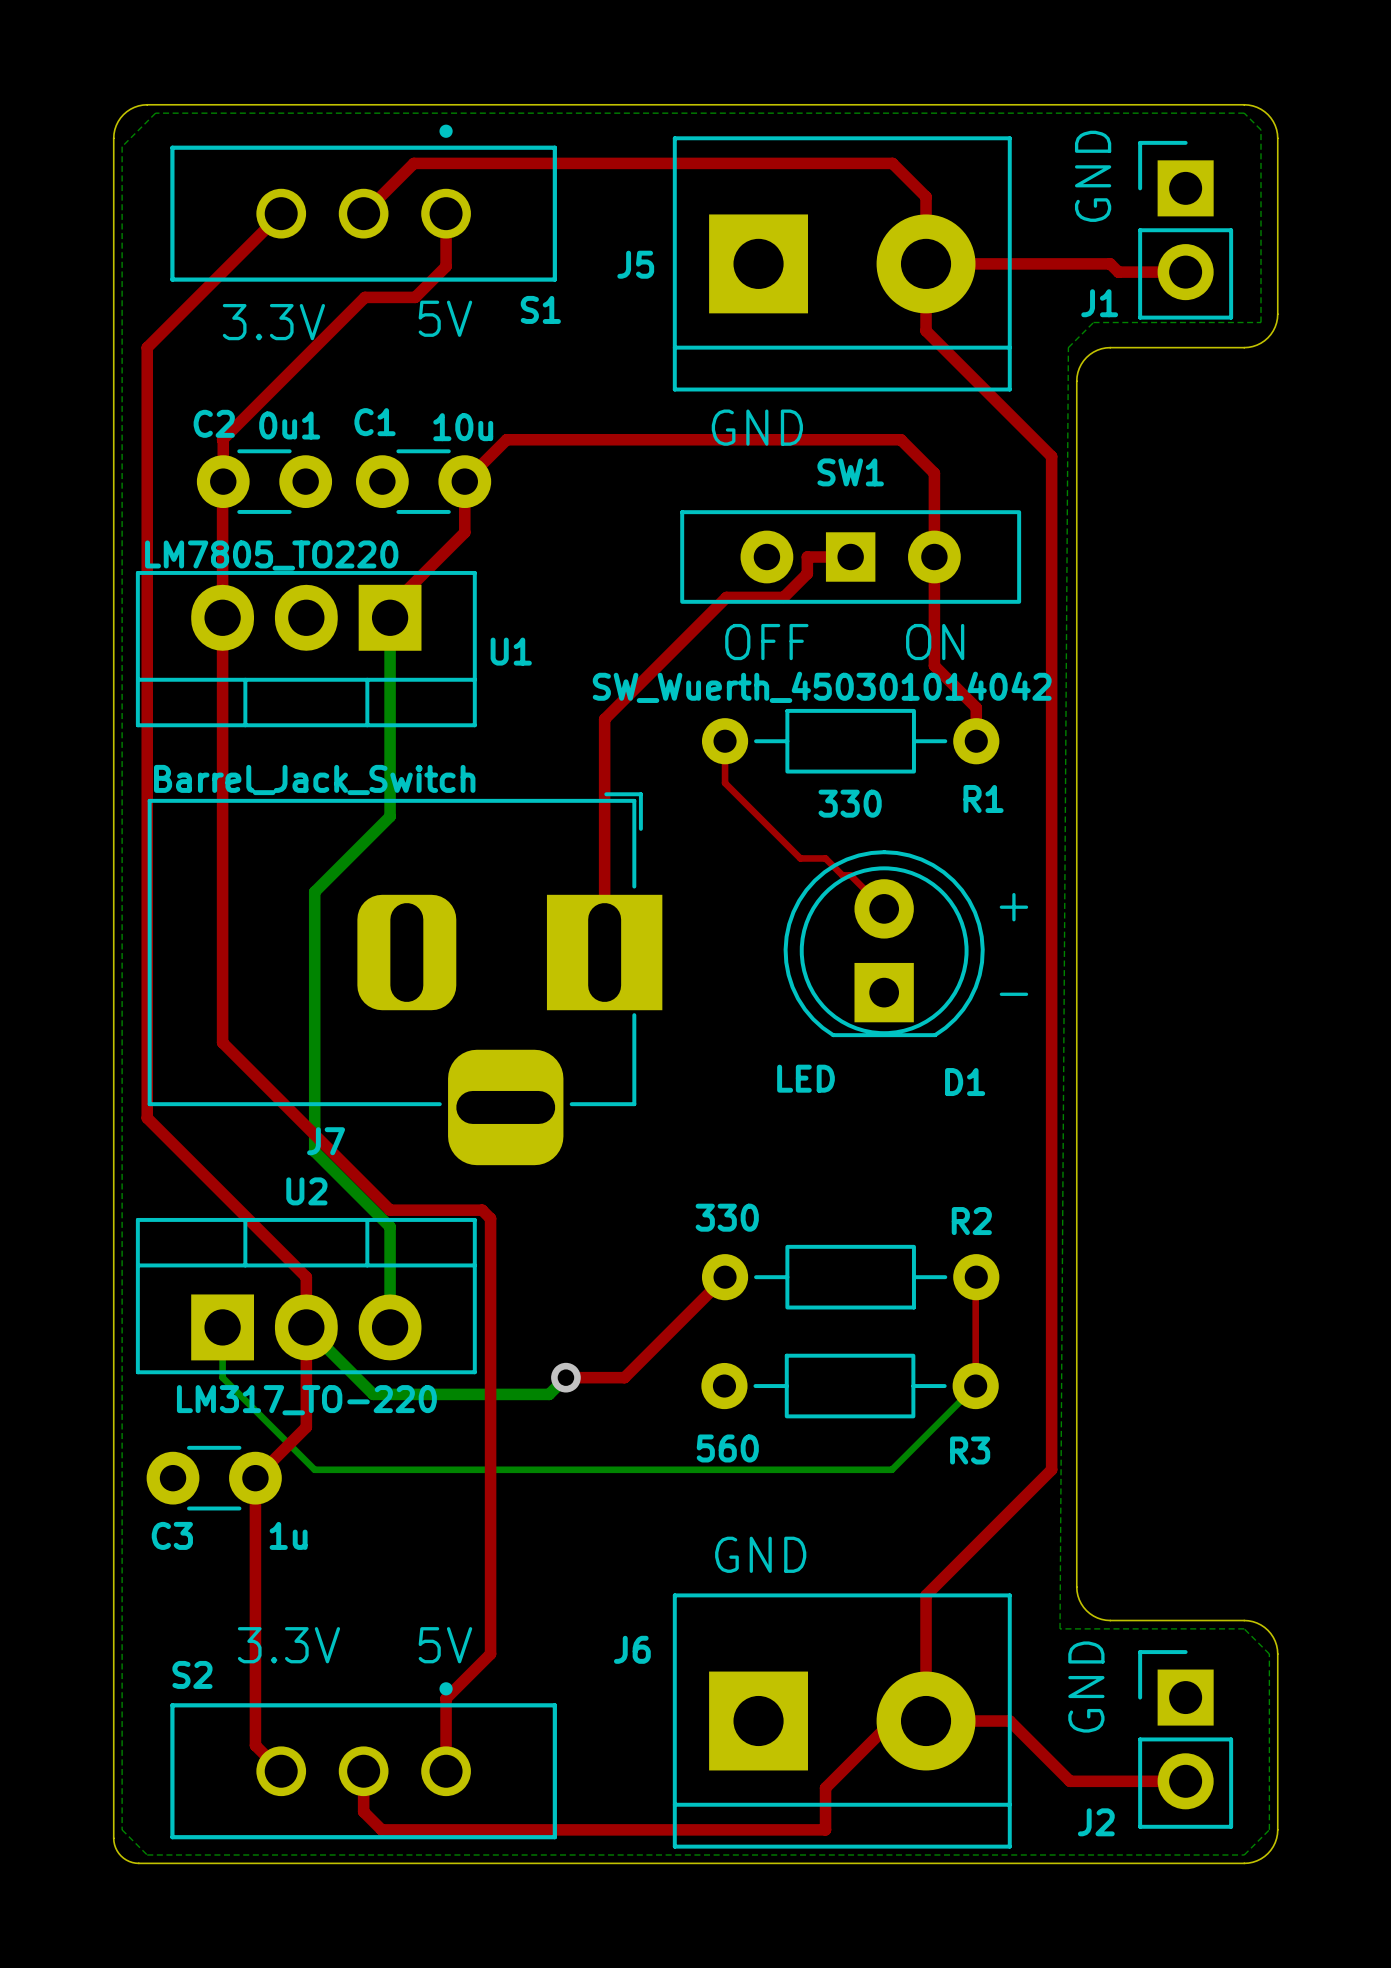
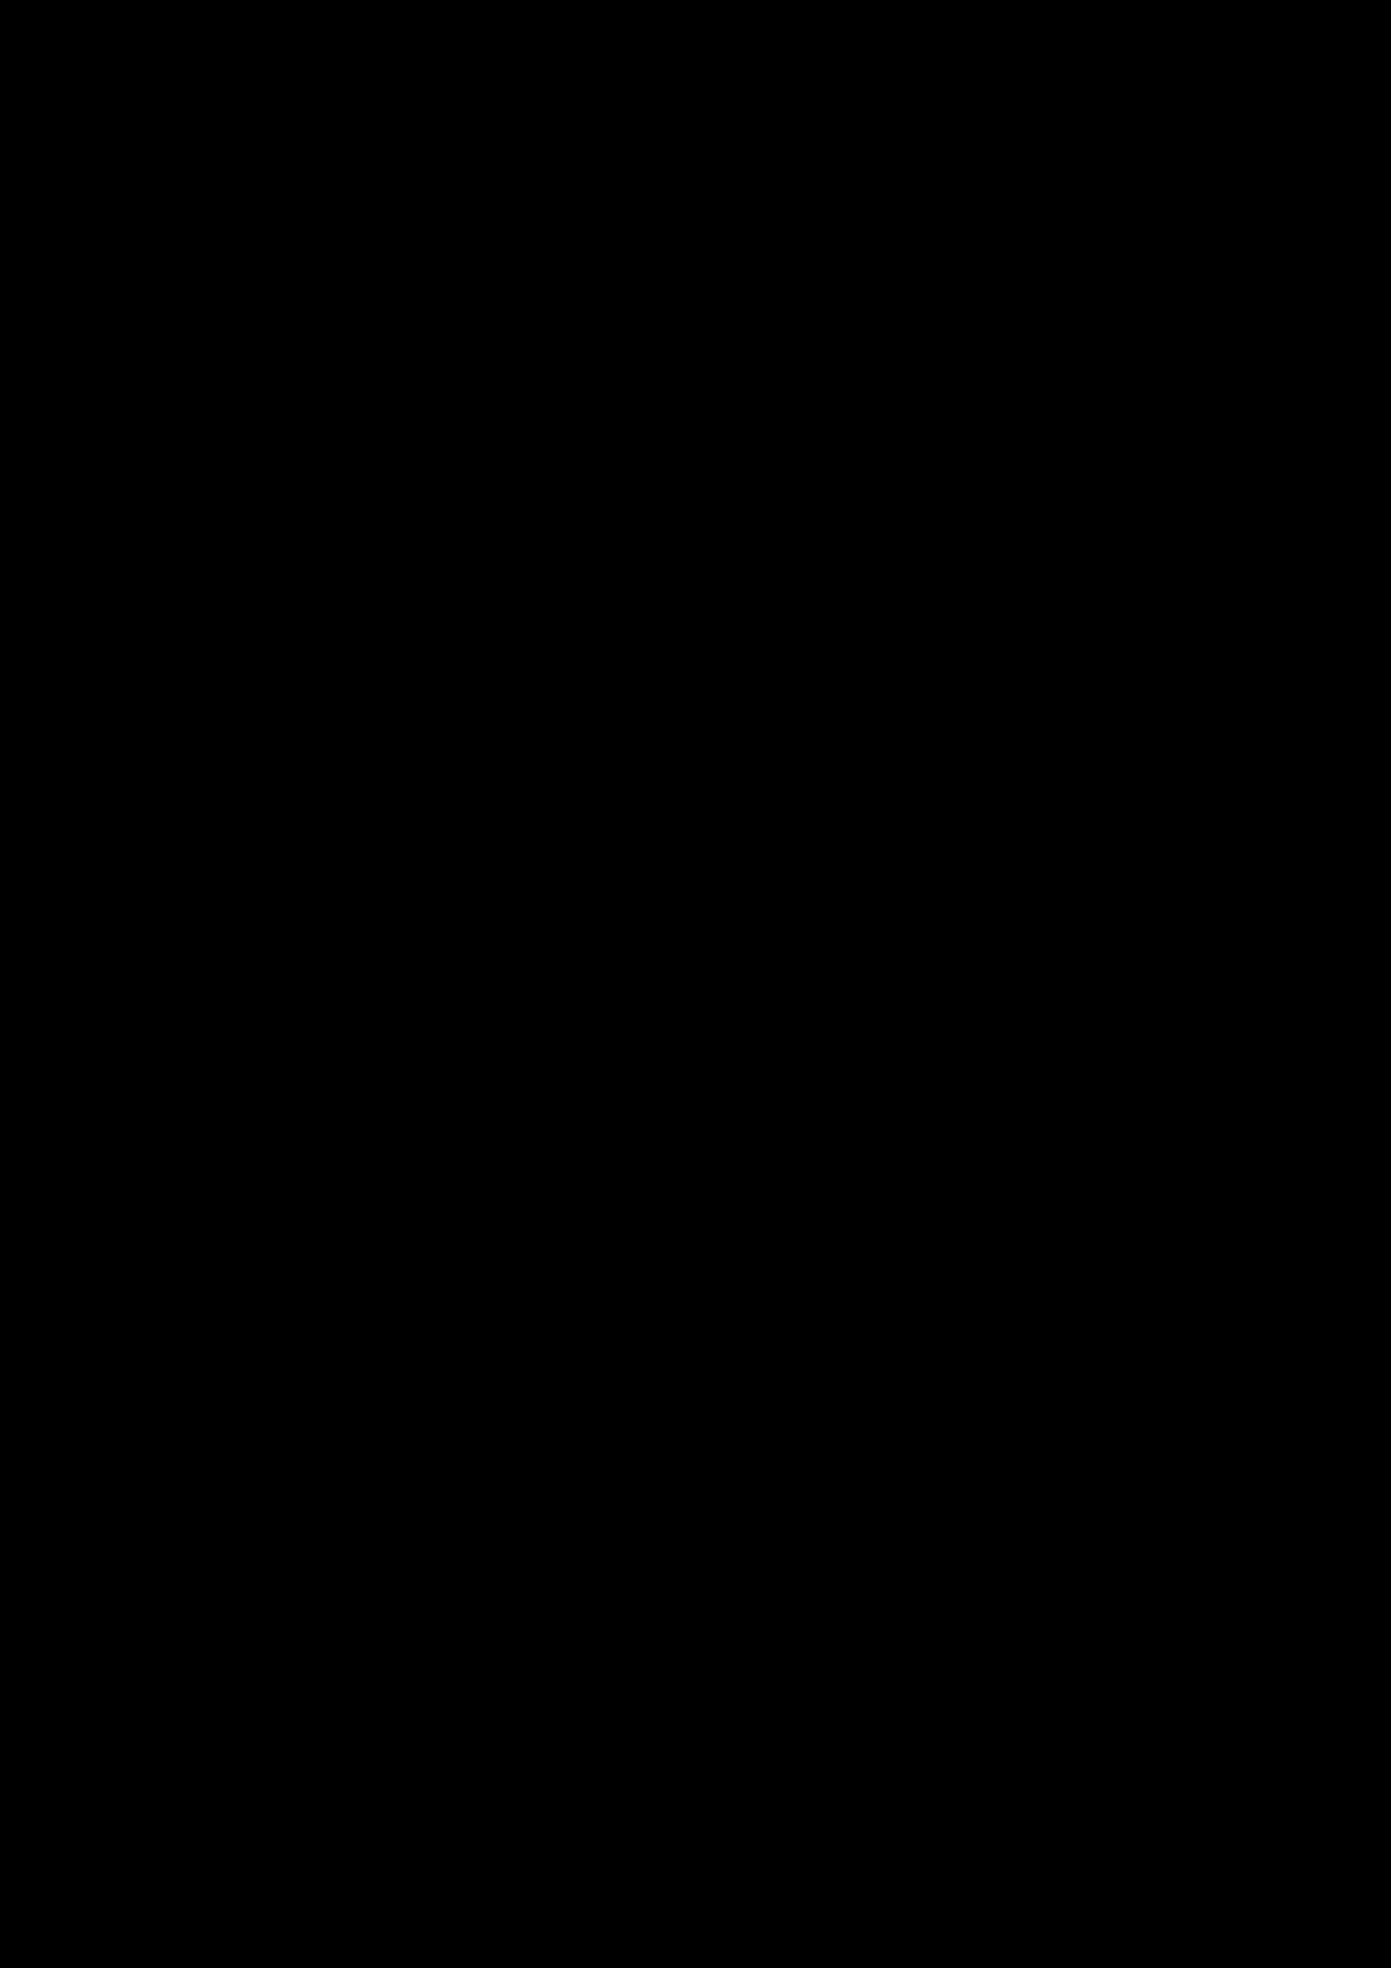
board edge: (147, 104) (1244, 104) (1261, 109) (1273, 121) (1277, 138) (1277, 314) (1276, 322) (1270, 334) (1261, 343) (1248, 347) (1101, 348) (1089, 354) (1083, 360) (1079, 368) (1076, 381) (1077, 1591) (1081, 1603) (1086, 1610) (1101, 1619) (1248, 1620) (1261, 1625) (1270, 1633) (1275, 1641) (1277, 1654) (1277, 1829) (1273, 1846) (1261, 1858) (1244, 1863) (138, 1863) (126, 1860) (117, 1850) (113, 1838) (113, 138) (116, 125) (123, 114) (134, 107) (147, 104) -> none
bottom zone outline: (155, 113) (122, 146) (122, 1829) (147, 1855) (1244, 1855) (1269, 1829) (1269, 1654) (1244, 1628) (1060, 1628) (1068, 347) (1093, 322) (1261, 322) (1261, 129) (1244, 113) (155, 113) -> none
text: GND (1093, 176) -> none
S1: (363, 203) -> none
top track: (281, 213) (147, 347) (147, 1118) (306, 1277) (306, 1427) (255, 1478) (255, 1745) (281, 1771) -> none
top track: (363, 213) (413, 163) (892, 163) (926, 196) (926, 330) (1051, 456) (1051, 1469) (926, 1595) (926, 1721) -> none
top track: (446, 213) (446, 266) (415, 297) (364, 297) (222, 439) (222, 1042) (390, 1210) (482, 1210) (490, 1218) (490, 1654) (446, 1698) (446, 1771) -> none
J1: (1185, 230) -> none
J5: (842, 263) -> none
top track: (926, 263) (1110, 263) (1118, 272) -> none
top track: (1118, 272) (1185, 272) -> none
text: 5V (445, 318) -> none
text: 3.3V (273, 322) -> none
text: GND (757, 427) -> none
C2: 0u1 (264, 481) -> none
C1: 10u (423, 481) -> none
top track: (850, 556) (807, 556) (807, 573) (783, 597) (726, 597) (604, 719) (604, 952) -> none
SW1: SW_Wuerth_450301014042 (850, 556) -> none
top track: (390, 617) (390, 607) (464, 532) (464, 481) (506, 439) (900, 439) (934, 473) (934, 665) (976, 707) (976, 741) -> none
bottom track: (390, 617) (390, 816) (314, 891) (314, 1151) (390, 1226) (390, 1327) -> none
text: OFF (766, 642) -> none
text: ON (935, 642) -> none
U1: LM7805_TO220 (306, 649) -> none
top track: (725, 741) (725, 783) (800, 858) (825, 858) (842, 875) (850, 875) (884, 908) -> none
R1: 330 (850, 741) -> none
text: + (1013, 907) -> none
D1: LED (884, 943) -> none
J7: Barrel_Jack_Switch (405, 978) -> none
text: - (1013, 994) -> none
top track: (725, 1277) (624, 1377) (565, 1377) -> none
R2: 330 (850, 1277) -> none
top track: (976, 1277) (975, 1386) -> none
U2: LM317_TO-220 (306, 1296) -> none
bottom track: (222, 1327) (222, 1377) (314, 1469) (891, 1469) (975, 1386) -> none
bottom track: (306, 1327) (373, 1394) (549, 1394) (565, 1377) -> none
via: (565, 1377) -> none
R3: 560 (850, 1386) -> none
C3: 1u (214, 1478) -> none
text: GND (760, 1554) -> none
text: 3.3V (288, 1645) -> none
text: 5V (445, 1645) -> none
text: GND (1086, 1687) -> none
J6: (842, 1721) -> none
J2: (1185, 1739) -> none
S2: (363, 1760) -> none
top track: (363, 1771) (363, 1811) (381, 1829) (825, 1829) (825, 1788) (892, 1721) (1009, 1721) (1070, 1781) (1185, 1781) -> none

